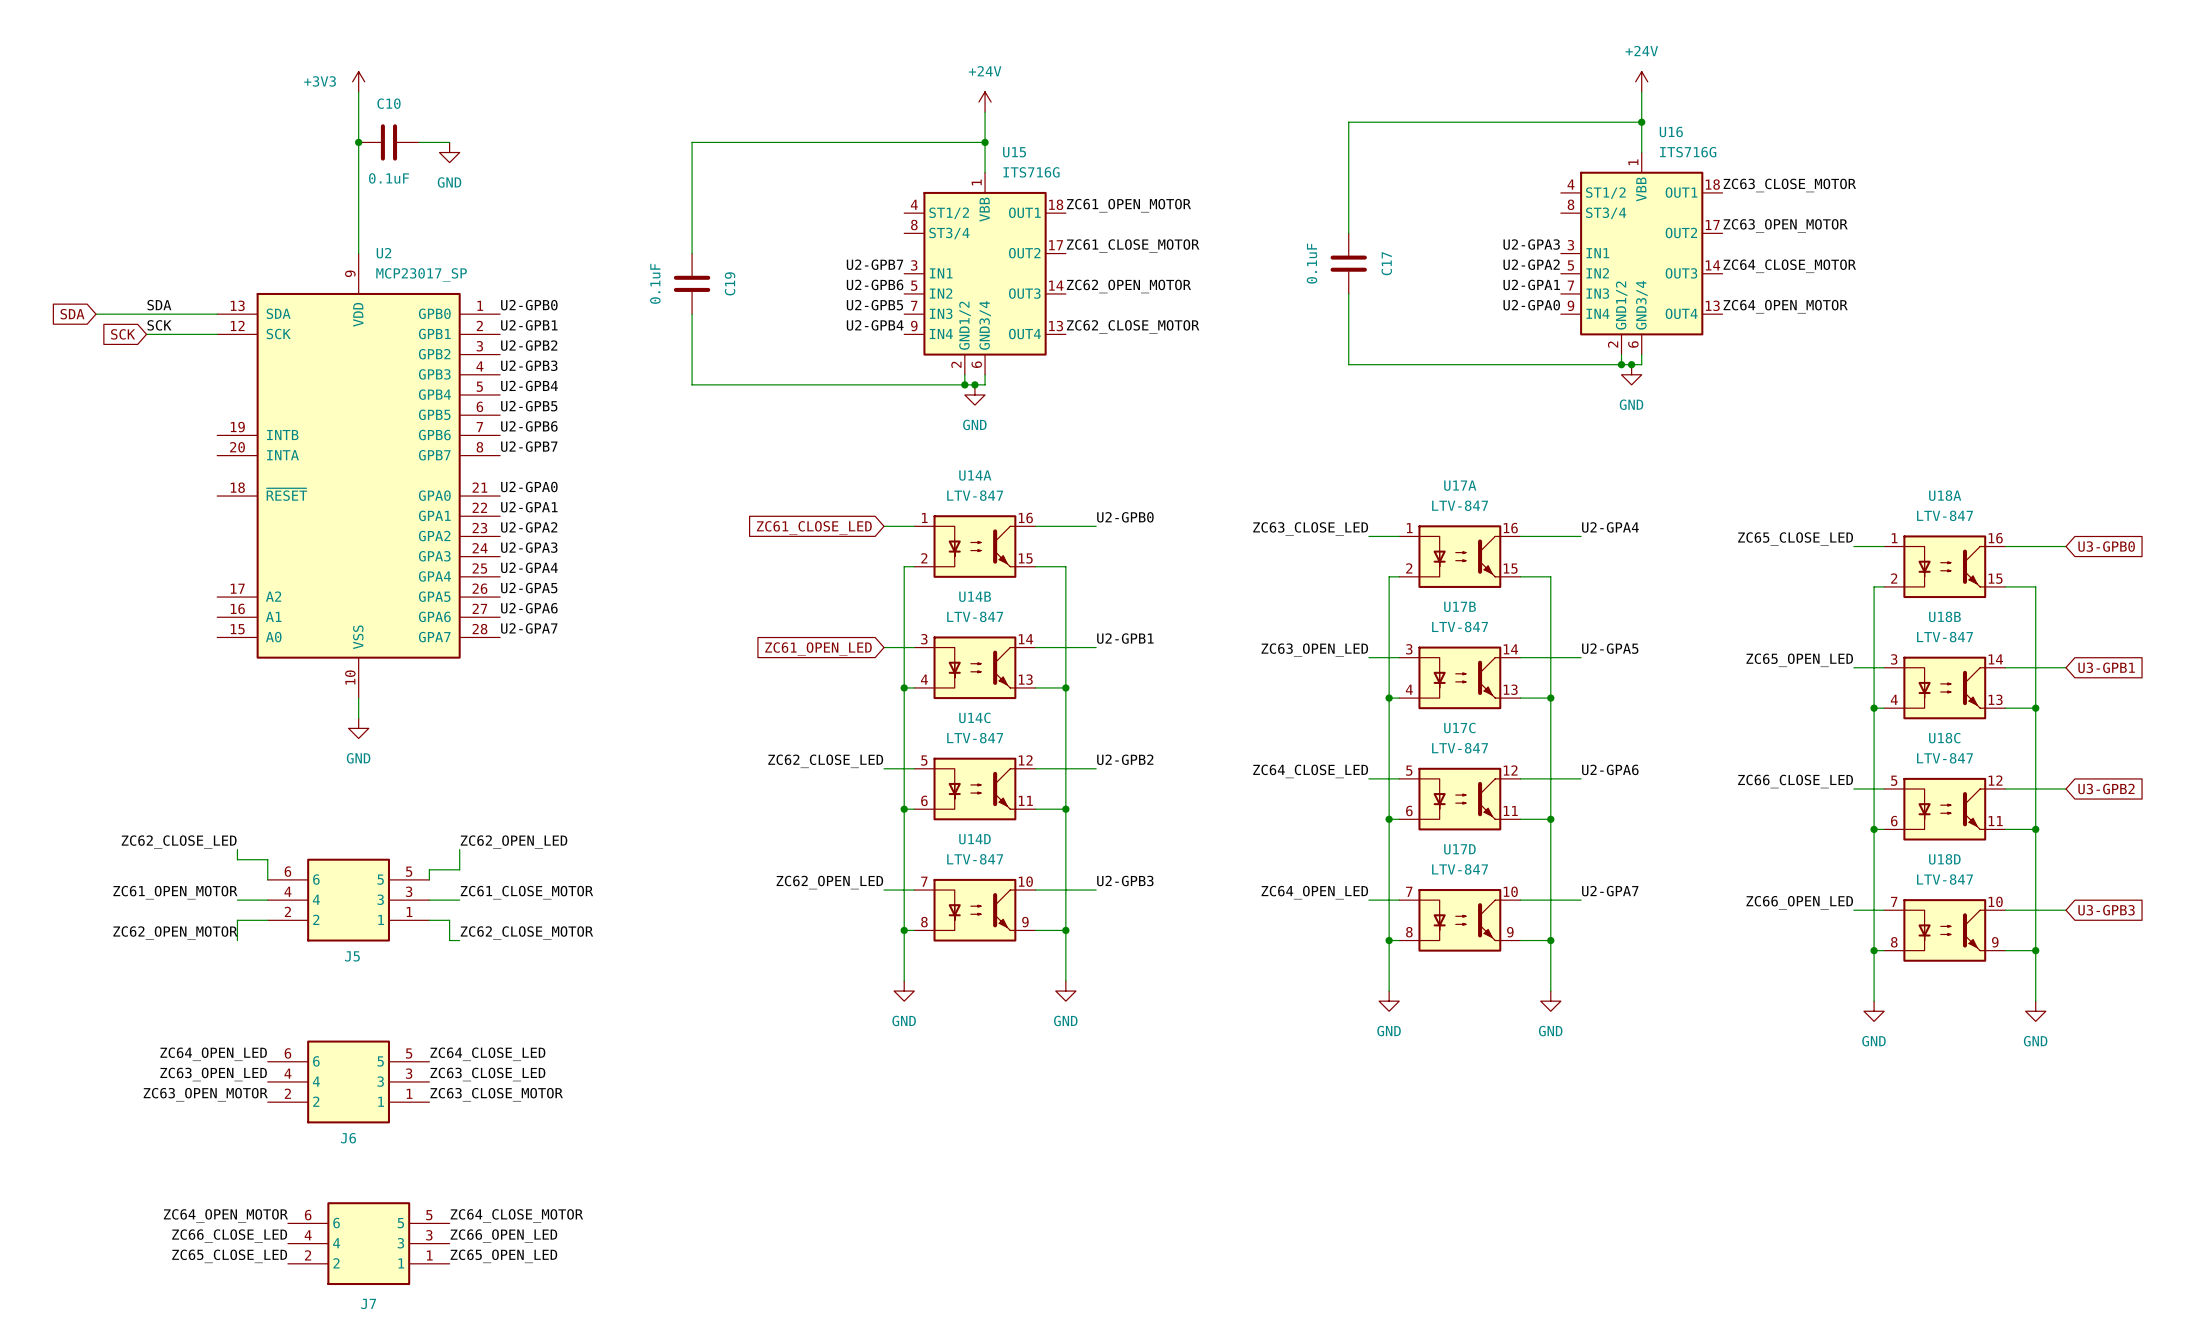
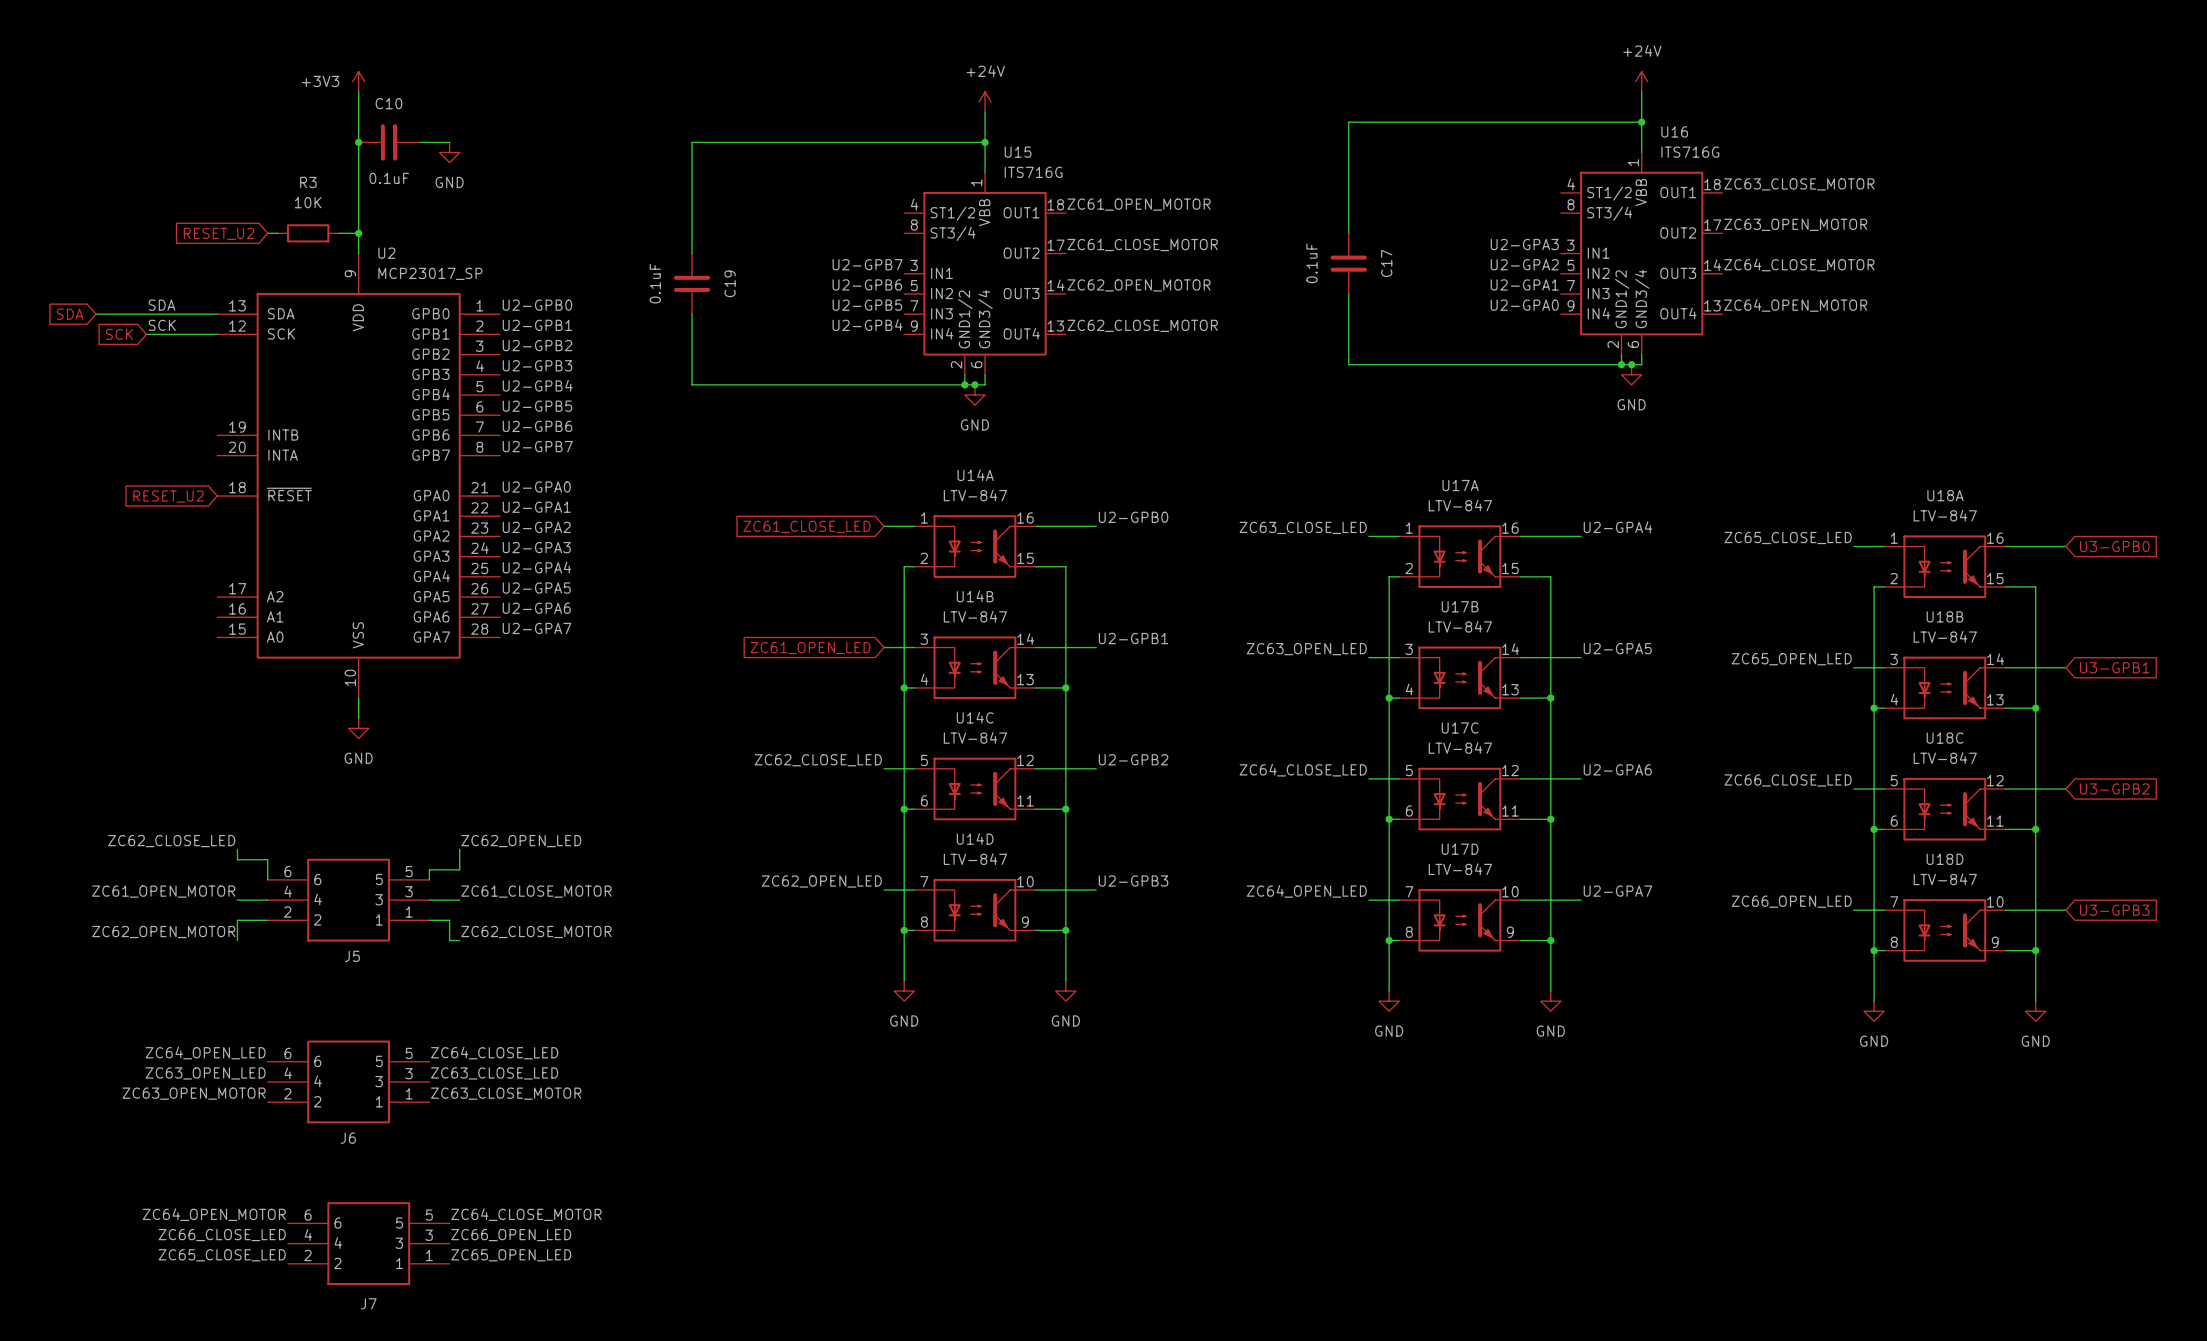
wire: none -> (267, 233) (277, 233)
R3: none -> 10K (308, 233)
wire: none -> (338, 233) (358, 233)
junction: none -> (358, 233)
global label: none -> RESET_U2 (219, 233)
global label: none -> RESET_U2 (168, 496)

